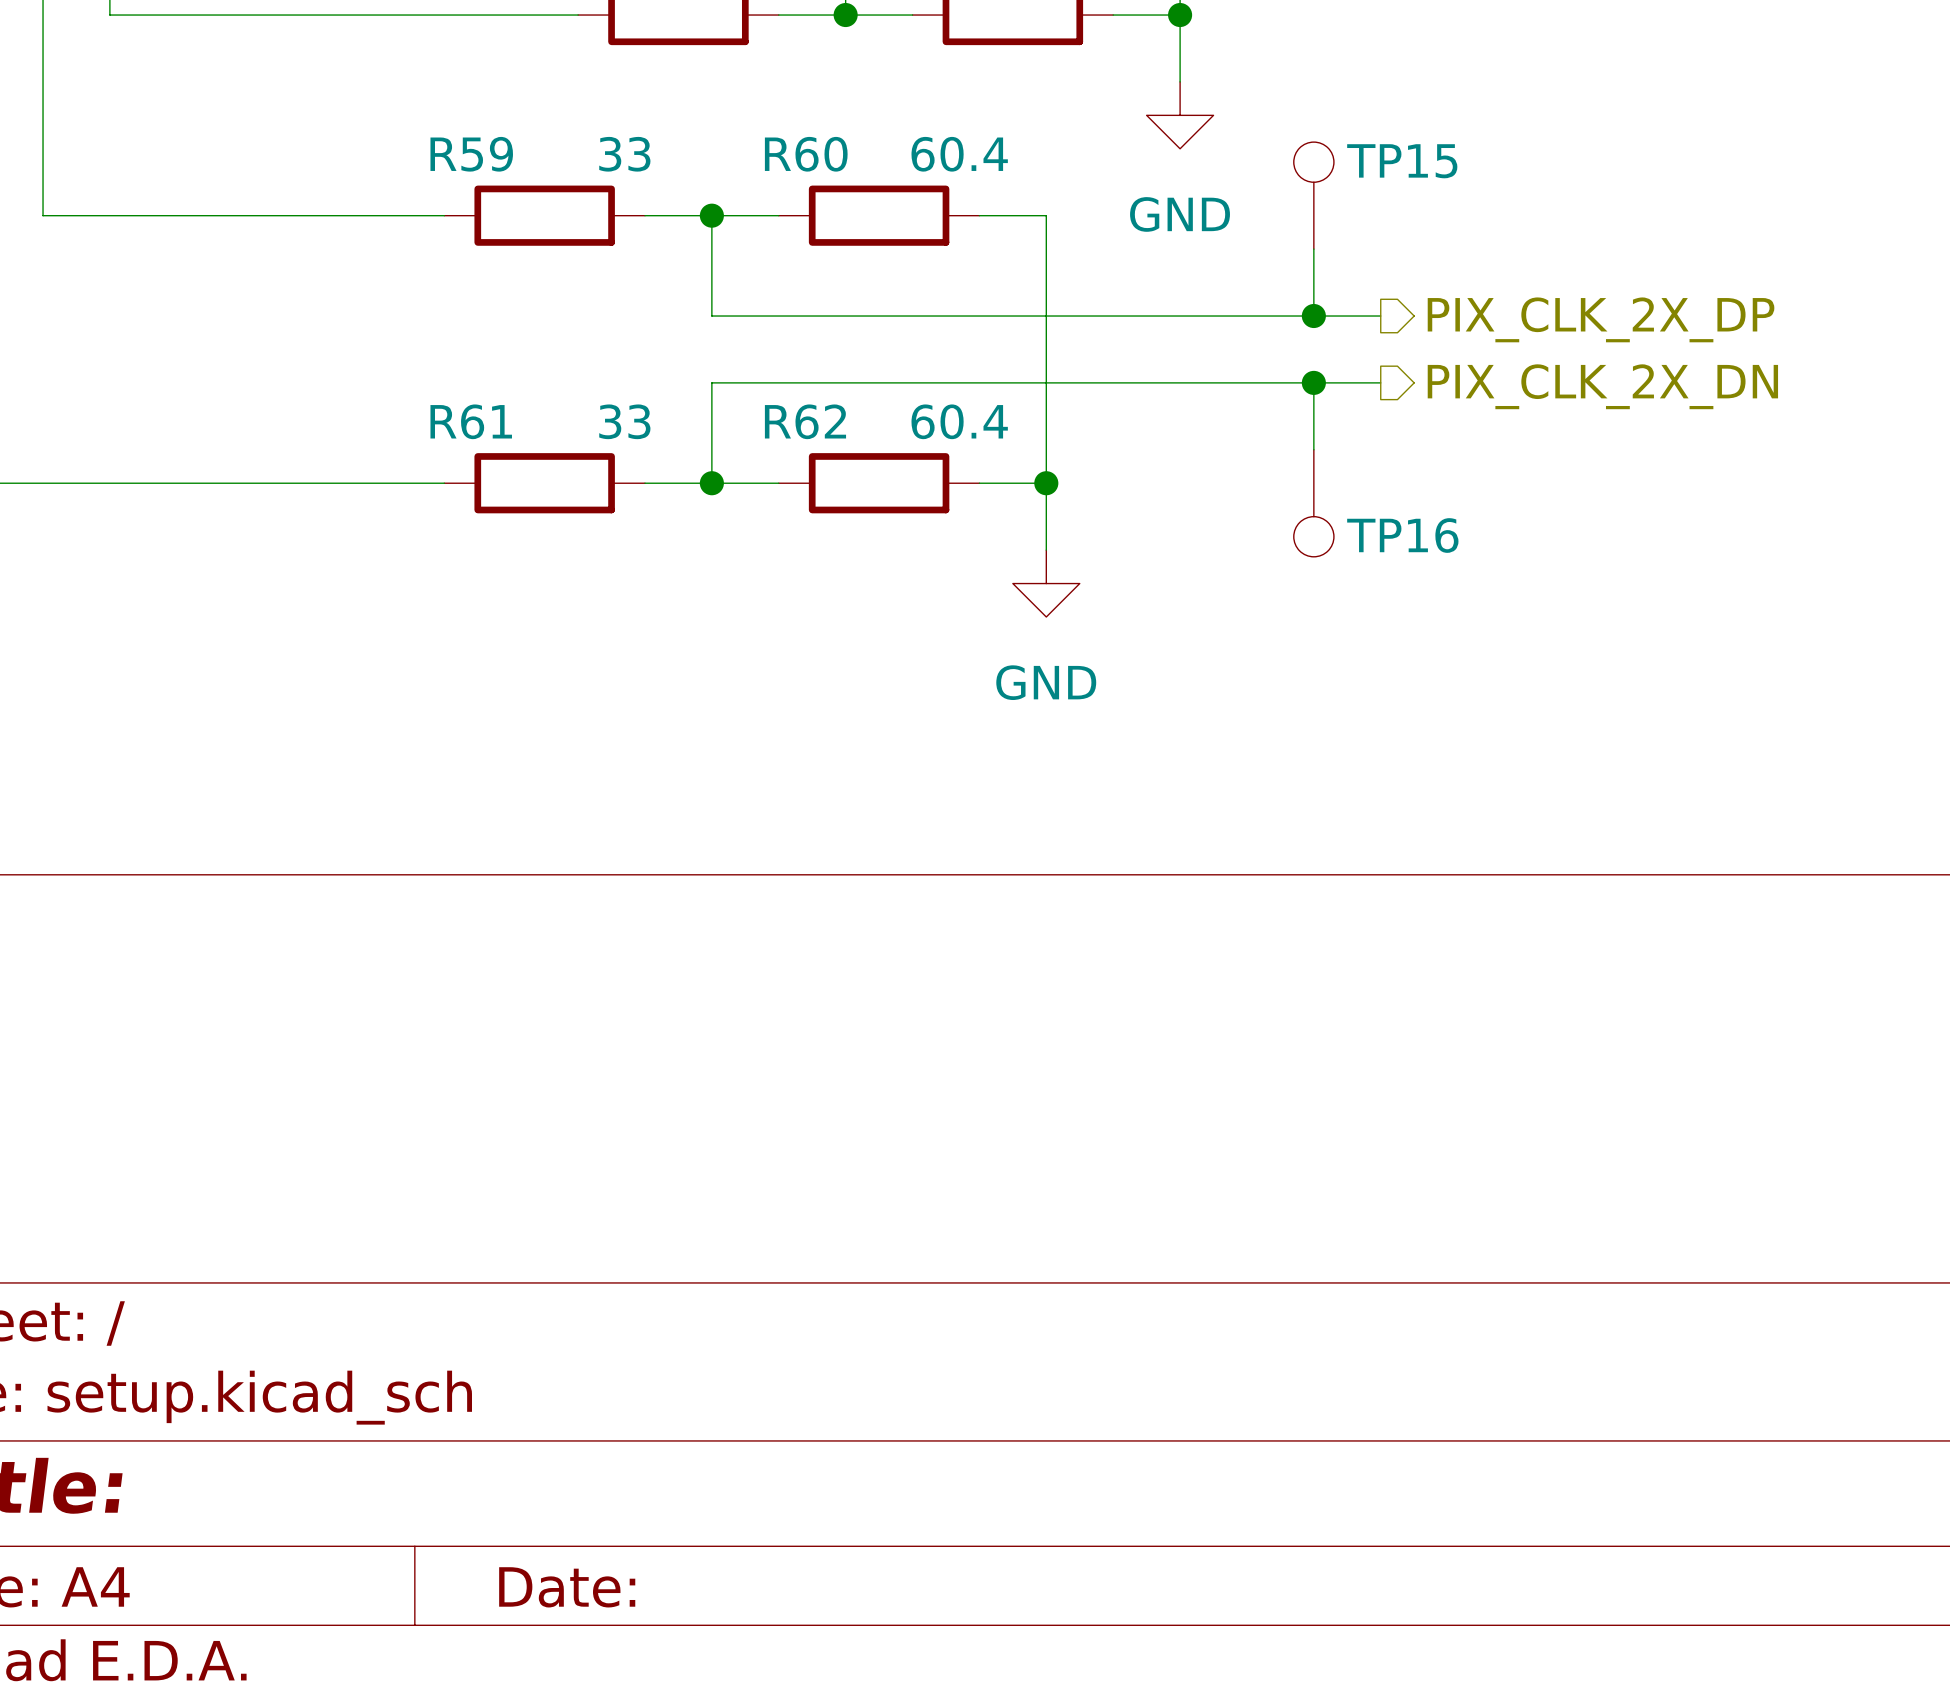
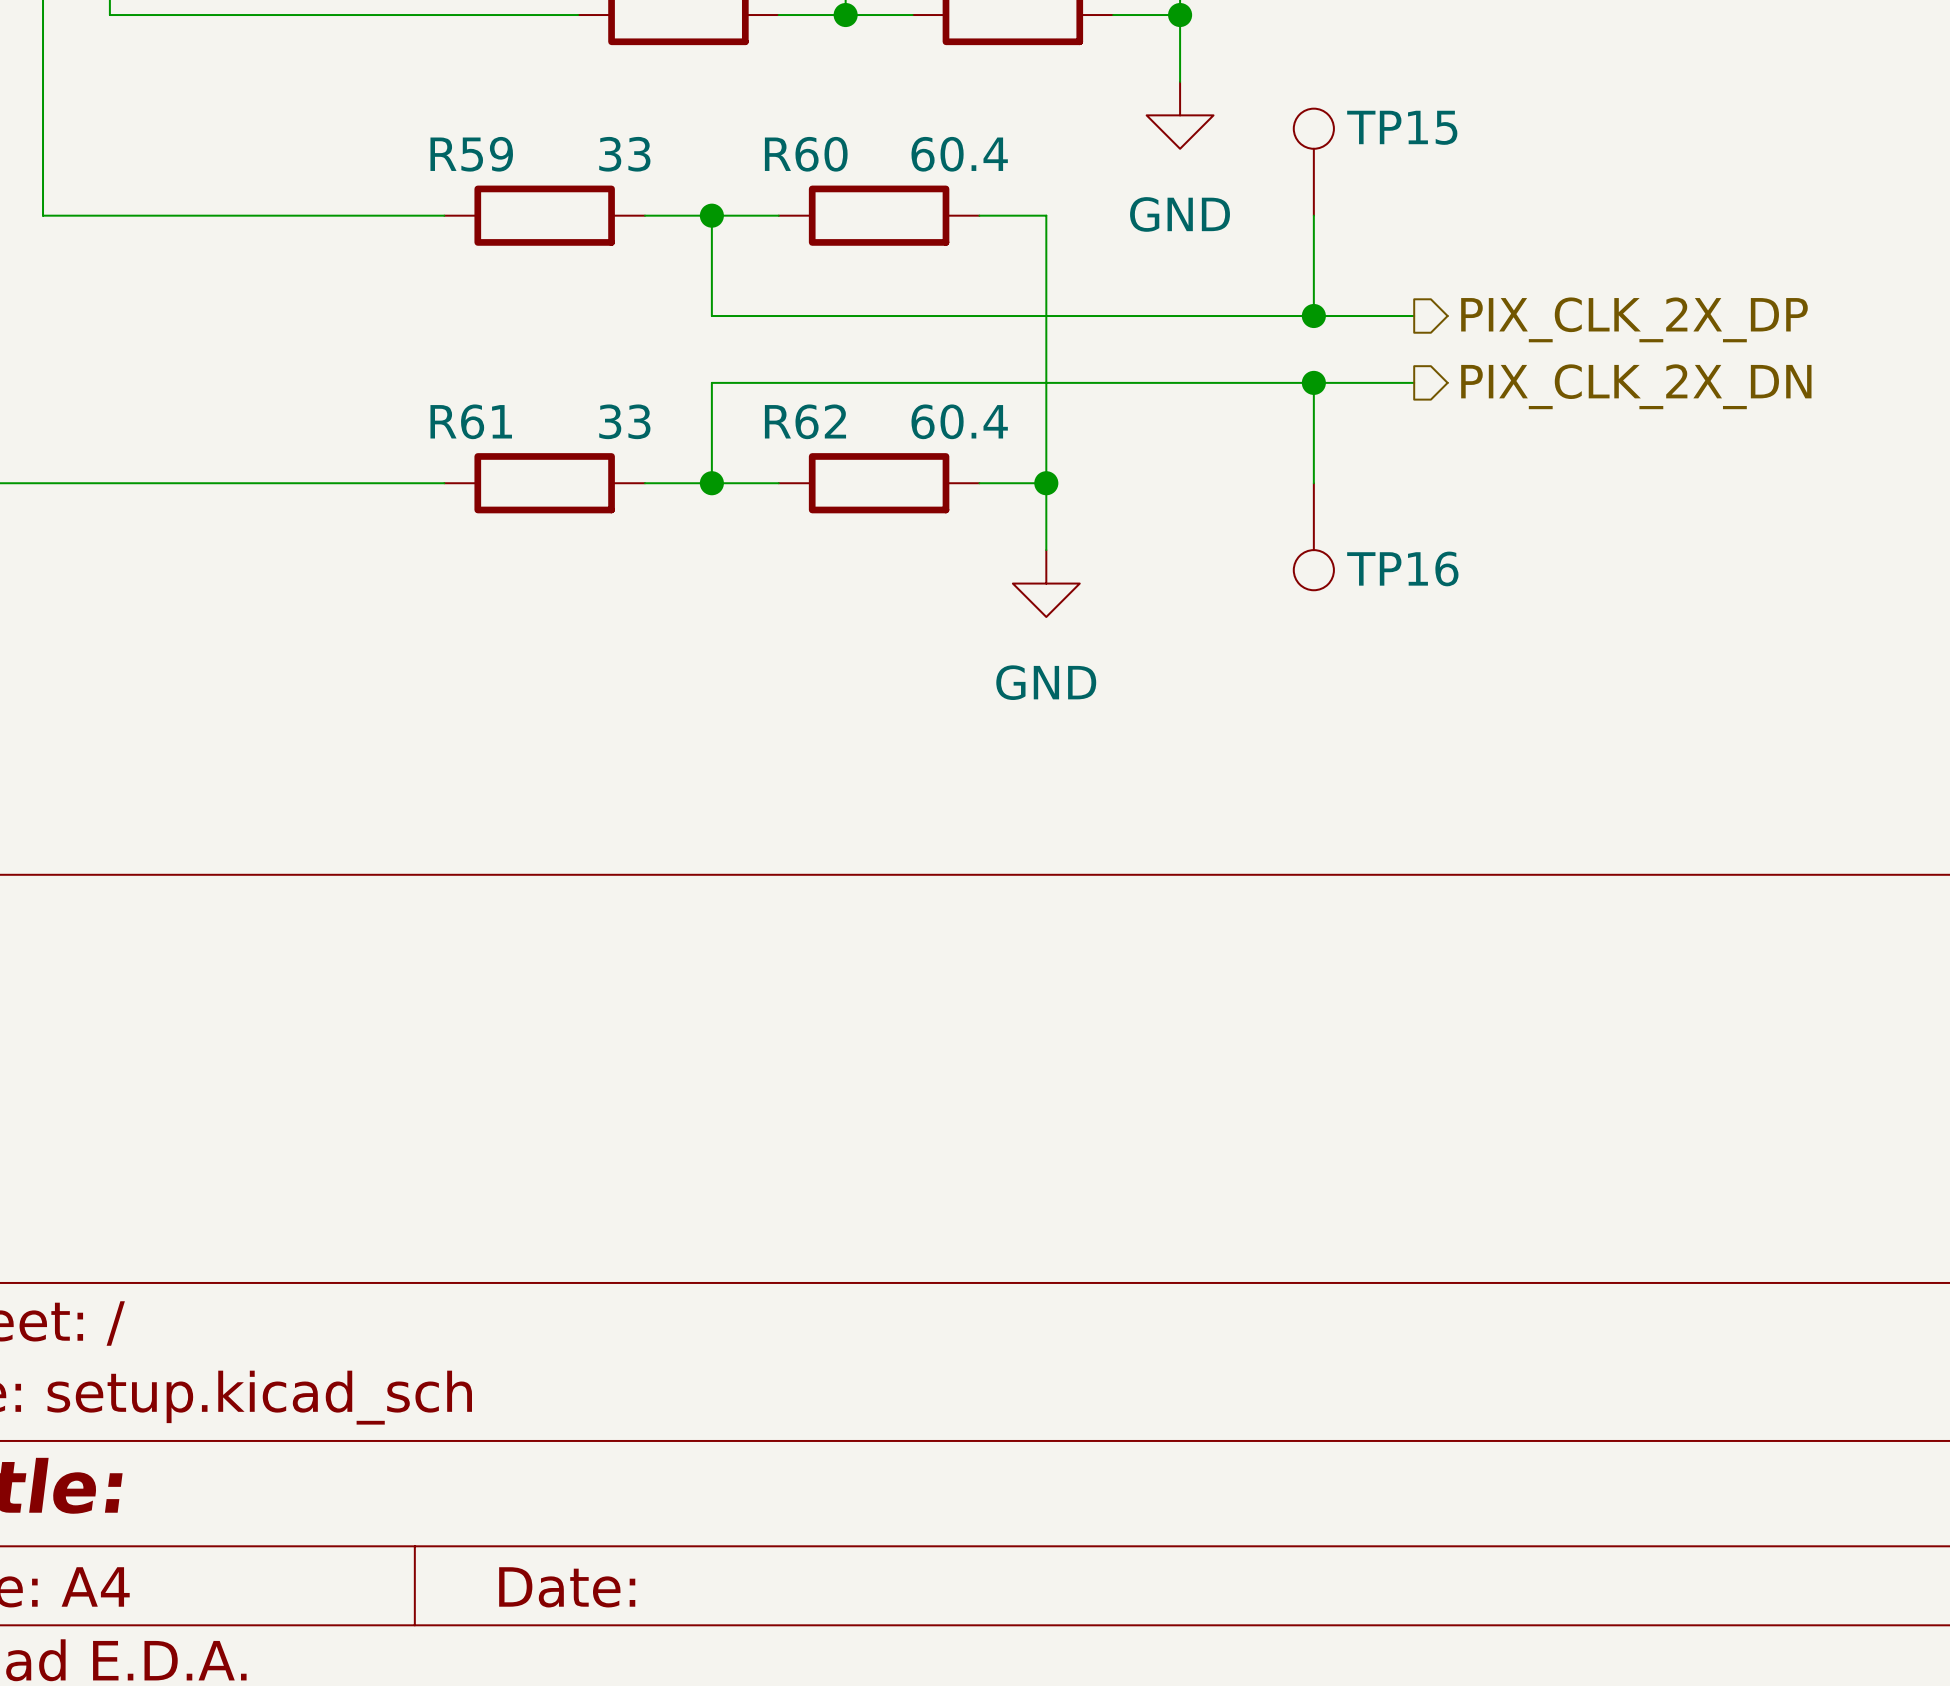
TP15 position: (1313, 195) -> (1313, 162)
wire: none -> (1380, 316) (1414, 316)
hierarchical label position: PIX_CLK_2X_DP (1601, 319) -> PIX_CLK_2X_DP (1634, 319)
wire: none -> (1380, 382) (1414, 382)
hierarchical label position: PIX_CLK_2X_DN (1602, 386) -> PIX_CLK_2X_DN (1636, 386)
TP16 position: (1313, 503) -> (1313, 536)

